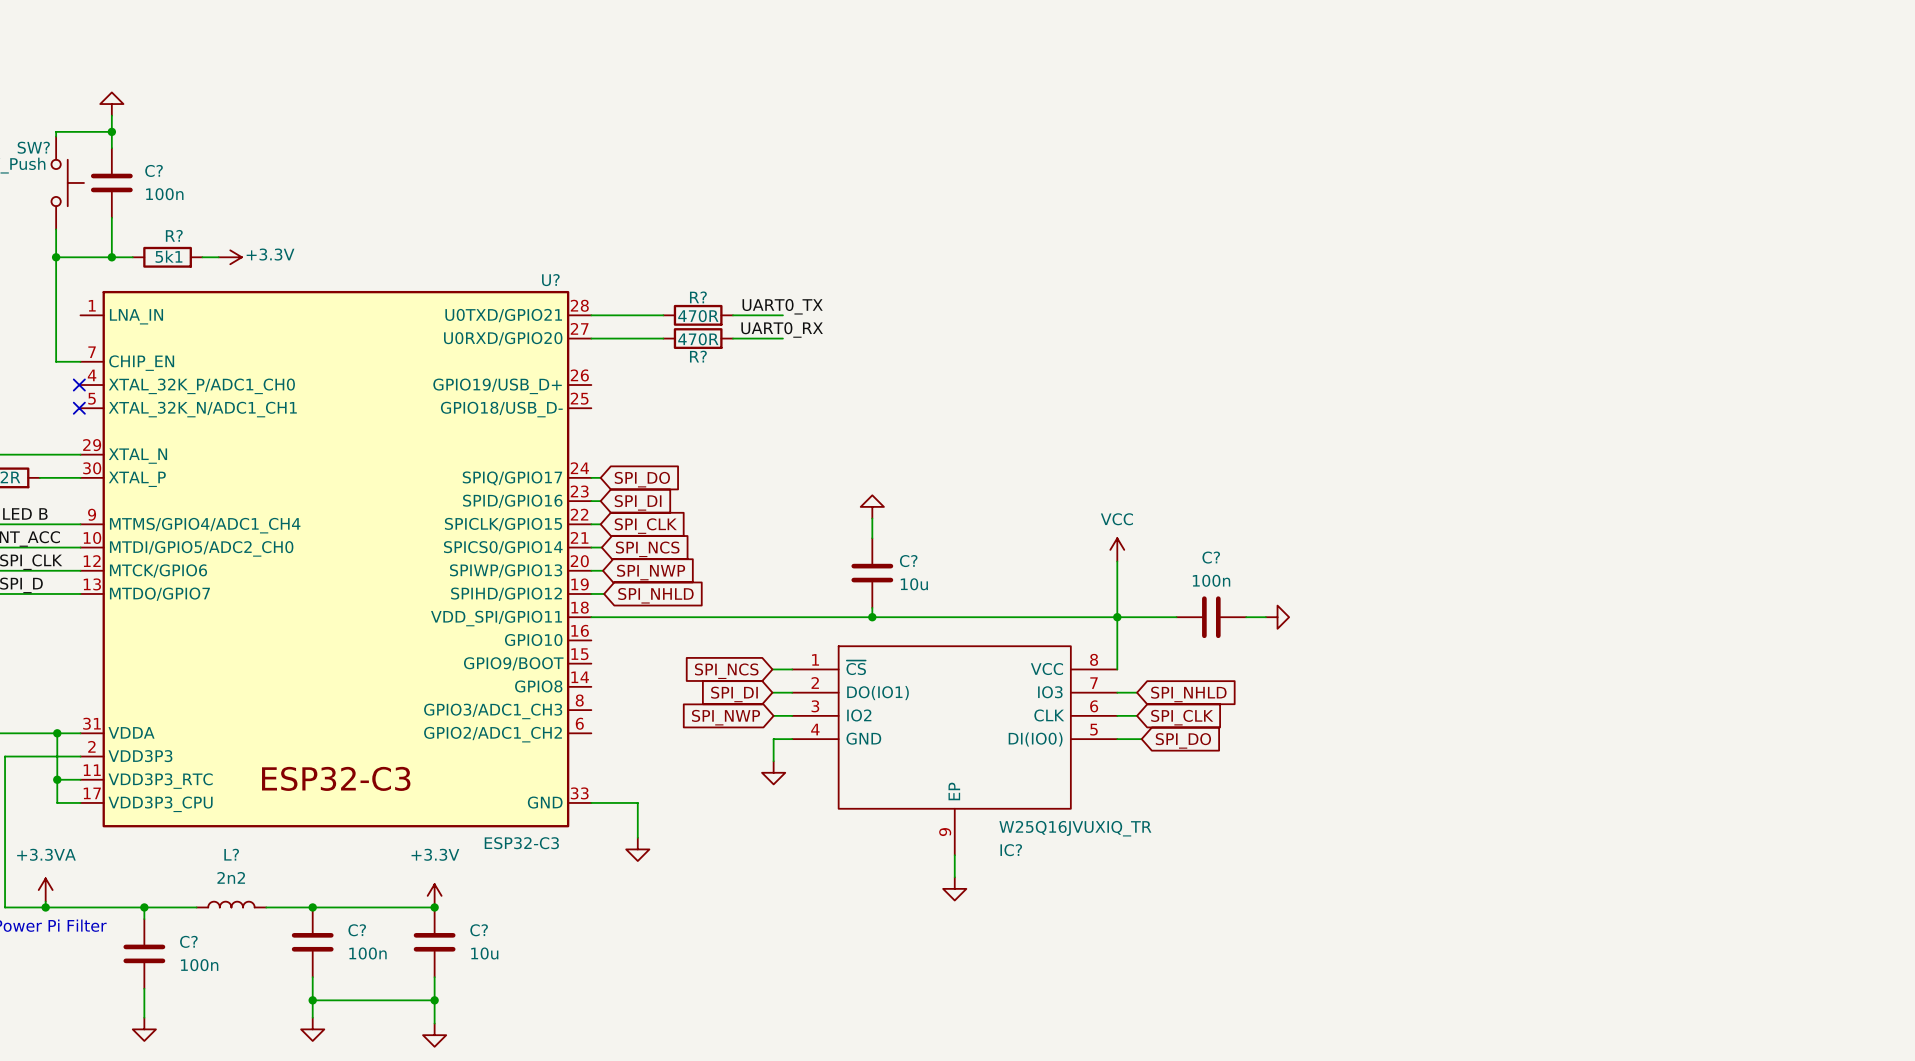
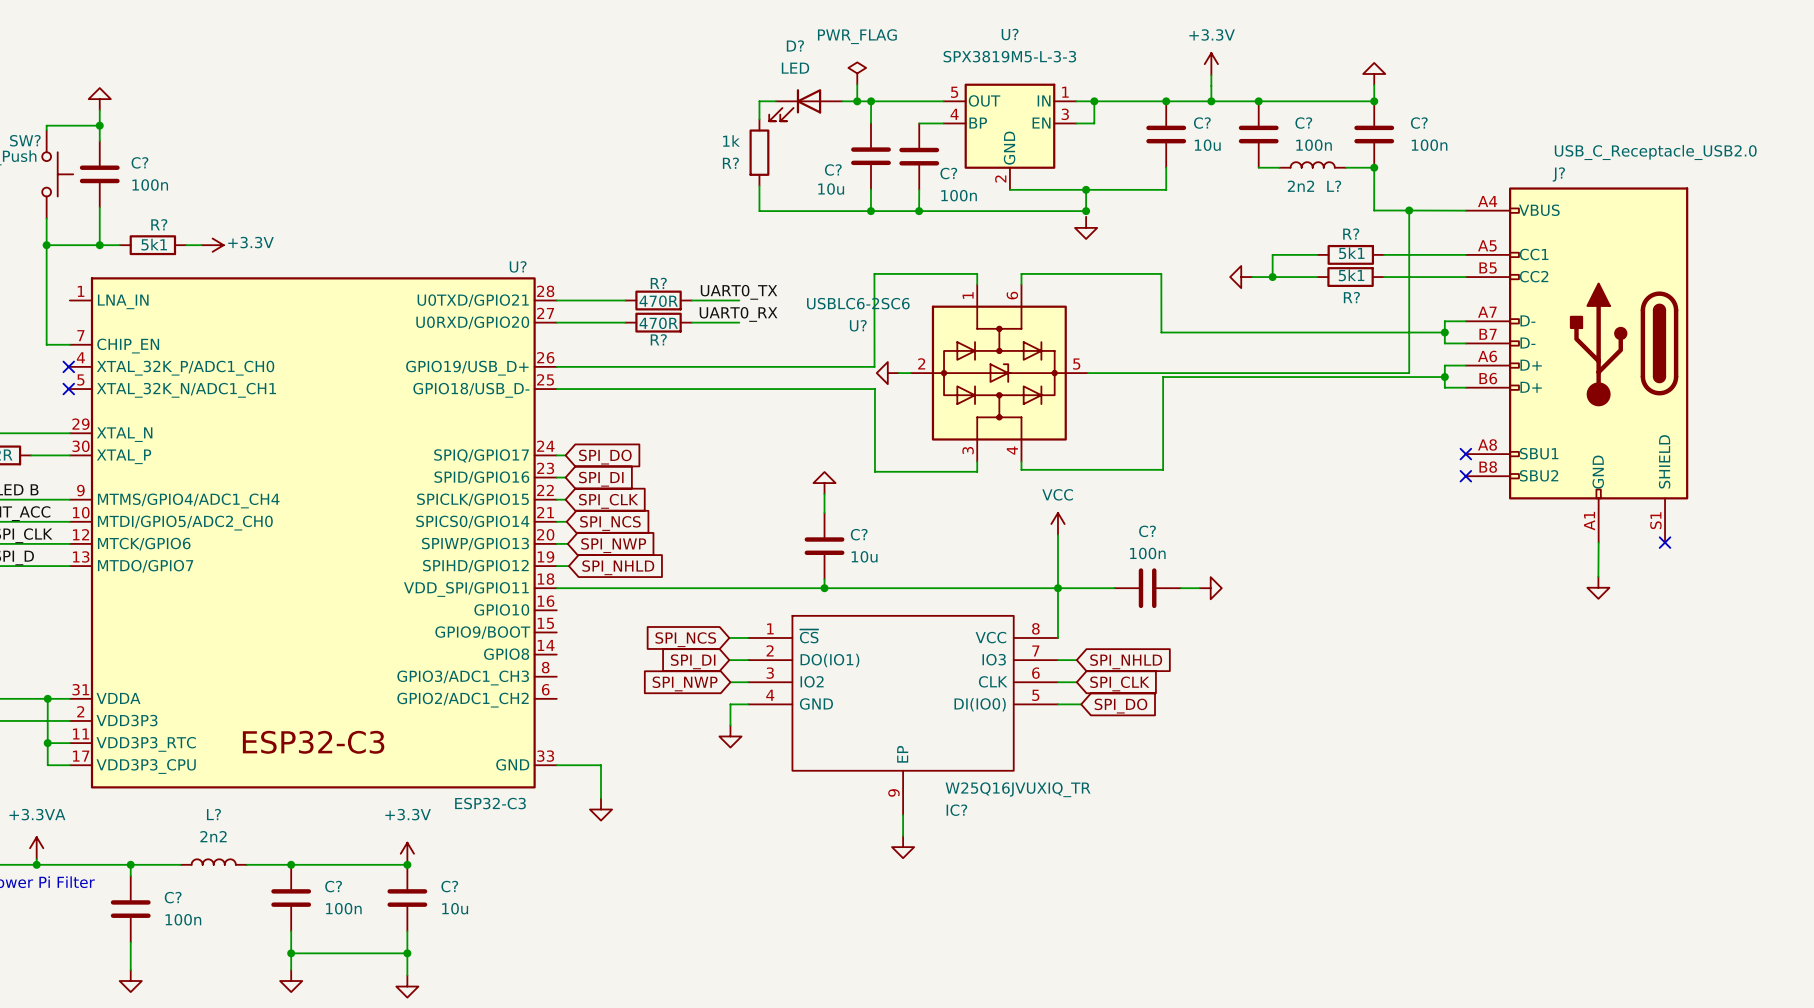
power symbol: none -> +3.3V (1211, 64)
power symbol: none -> PWR_FLAG (857, 73)
power symbol: none -> (1374, 74)
wire: none -> (1211, 75) (1211, 101)
wire: none -> (857, 84) (857, 101)
wire: none -> (1374, 85) (1374, 101) (1076, 101)
wire: none -> (775, 101) (759, 101) (759, 119)
wire: none -> (842, 101) (943, 101)
junction: none -> (857, 101)
wire: none -> (871, 101) (870, 123)
junction: none -> (871, 101)
wire: none -> (1094, 101) (1094, 123) (1076, 123)
junction: none -> (1094, 101)
junction: none -> (1166, 101)
junction: none -> (1211, 101)
junction: none -> (1258, 101)
junction: none -> (1374, 101)
D?: none -> LED (805, 105)
wire: none -> (919, 123) (943, 123)
C?: none -> 10u (1166, 134)
C?: none -> 100n (1258, 134)
C?: none -> 100n (1374, 134)
U?: none -> SPX3819M5-L-3-3 (1009, 136)
R?: none -> 1k (759, 152)
C?: none -> 10u (870, 156)
C?: none -> 100n (919, 156)
L?: none -> 2n2 (1312, 164)
wire: none -> (1166, 167) (1166, 189) (1086, 189)
wire: none -> (1258, 167) (1279, 167)
wire: none -> (1345, 167) (1374, 167) (1374, 210) (1409, 210)
junction: none -> (1374, 167)
wire: none -> (759, 185) (759, 211) (1086, 211) (1086, 189)
wire: none -> (870, 189) (870, 211)
wire: none -> (919, 189) (919, 211)
wire: none -> (1009, 189) (1086, 189)
junction: none -> (1086, 189)
wire: none -> (1409, 210) (1409, 373) (1087, 373)
wire: none -> (1409, 210) (1465, 210)
junction: none -> (1409, 210)
junction: none -> (870, 211)
junction: none -> (919, 211)
junction: none -> (1086, 211)
power symbol: none -> (1086, 227)
wire: none -> (1317, 254) (1272, 254) (1272, 277)
R?: none -> 5k1 (1350, 254)
wire: none -> (1383, 254) (1465, 254)
power symbol: none -> (1241, 277)
wire: none -> (1252, 277) (1317, 277)
junction: none -> (1272, 277)
R?: none -> 5k1 (1350, 277)
wire: none -> (1383, 277) (1465, 277)
wire: none -> (977, 284) (977, 273) (874, 273) (874, 366) (556, 366)
wire: none -> (1021, 284) (1021, 273) (1161, 273) (1161, 332) (1444, 332)
wire: none -> (1465, 321) (1444, 321) (1444, 343) (1465, 343)
junction: none -> (1444, 332)
wire: none -> (1465, 365) (1444, 365) (1444, 387) (1465, 387)
J?: none -> USB_C_Receptacle_USB2.0 (1577, 365)
power symbol: none -> (887, 373)
wire: none -> (898, 373) (910, 373)
U?: none -> USBLC6-2SC6 (999, 373)
wire: none -> (1444, 377) (1163, 377) (1163, 469) (1021, 469) (1021, 461)
junction: none -> (1444, 377)
wire: none -> (556, 389) (874, 389) (874, 471) (977, 471) (977, 461)
no-connect mark: none -> (1465, 454)
no-connect mark: none -> (1465, 476)
wire: none -> (1598, 542) (1598, 576)
no-connect mark: none -> (1665, 542)
power symbol: none -> (1598, 587)

